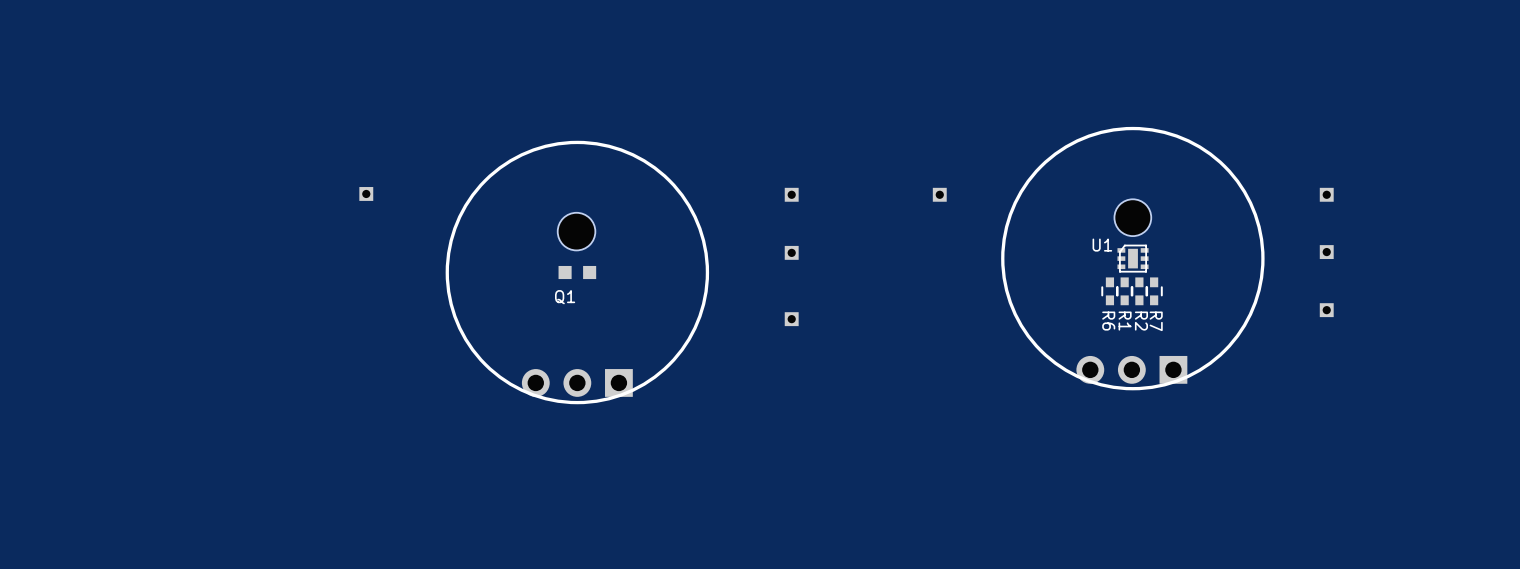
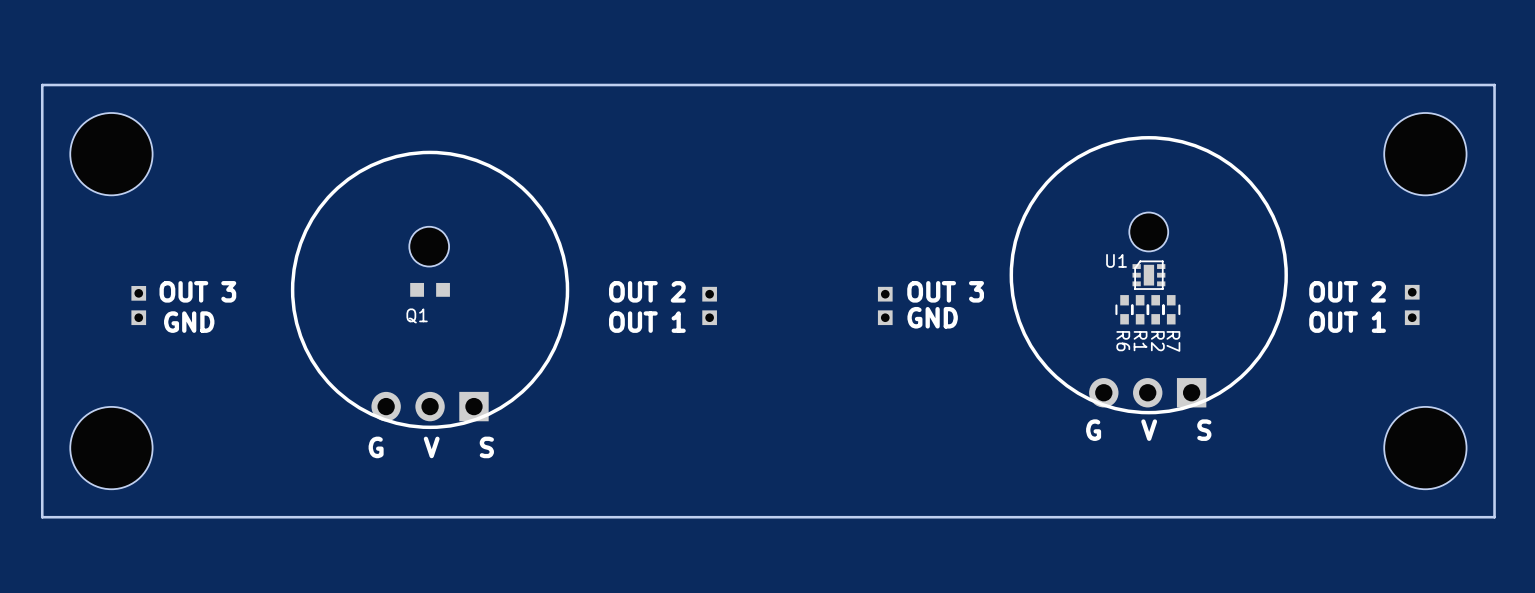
board edge: none -> (1494, 85) (1494, 517) (42, 517) (42, 85) (1494, 85)
part: none -> (111, 154)
part: none -> (1425, 154)
part: (366, 193) -> none
part: (791, 194) -> none
part: (939, 194) -> none
part: (1326, 194) -> none
part position: (576, 231) -> (429, 246)
part: (791, 252) -> none
part: (1326, 252) -> none
Q1 position: (577, 272) -> (430, 289)
drawing position: (577, 272) -> (430, 289)
text: none -> OUT 3 (197, 291)
text: none -> OUT 2 (647, 291)
text: none -> OUT 3 (945, 291)
text: none -> OUT 2 (1347, 291)
part: none -> (1412, 292)
part: none -> (138, 293)
part: none -> (709, 294)
part: none -> (885, 294)
part: none -> (138, 317)
part: none -> (709, 317)
part: none -> (885, 317)
text: none -> GND (932, 317)
part: none -> (1412, 317)
text: none -> GND (189, 322)
text: none -> OUT 1 (647, 322)
text: none -> OUT 1 (1347, 322)
part: (1326, 310) -> none
part: (791, 319) -> none
part position: (577, 382) -> (430, 406)
text: none -> G V S (1148, 430)
text: none -> G V S (431, 447)
part: none -> (111, 448)
part: none -> (1425, 448)

